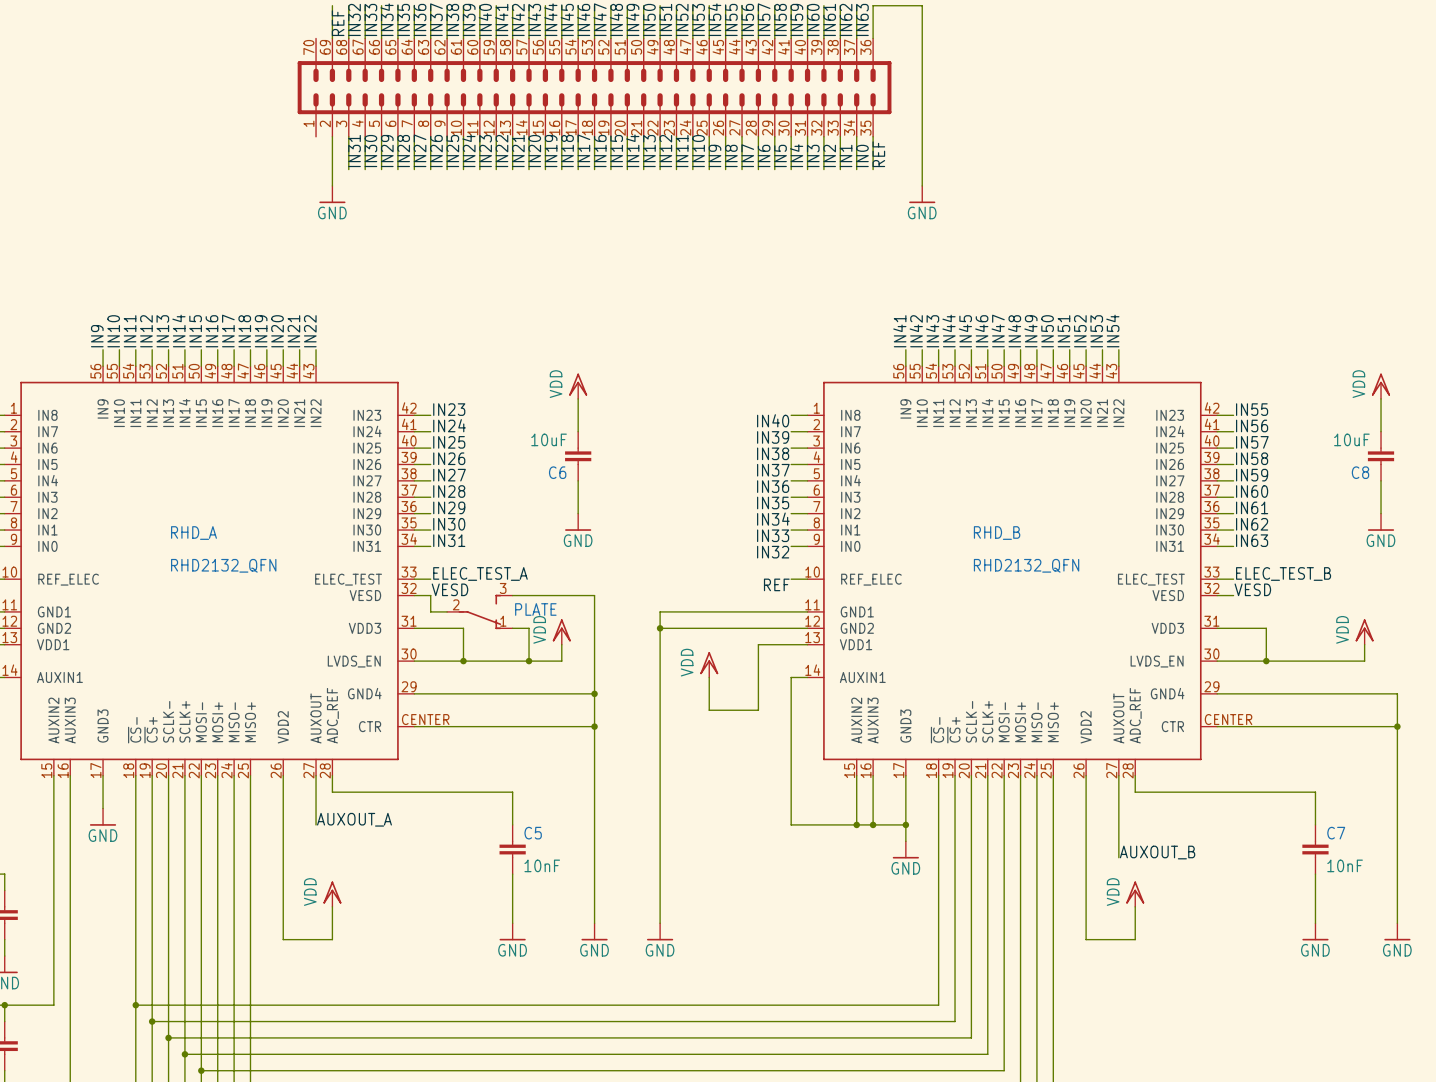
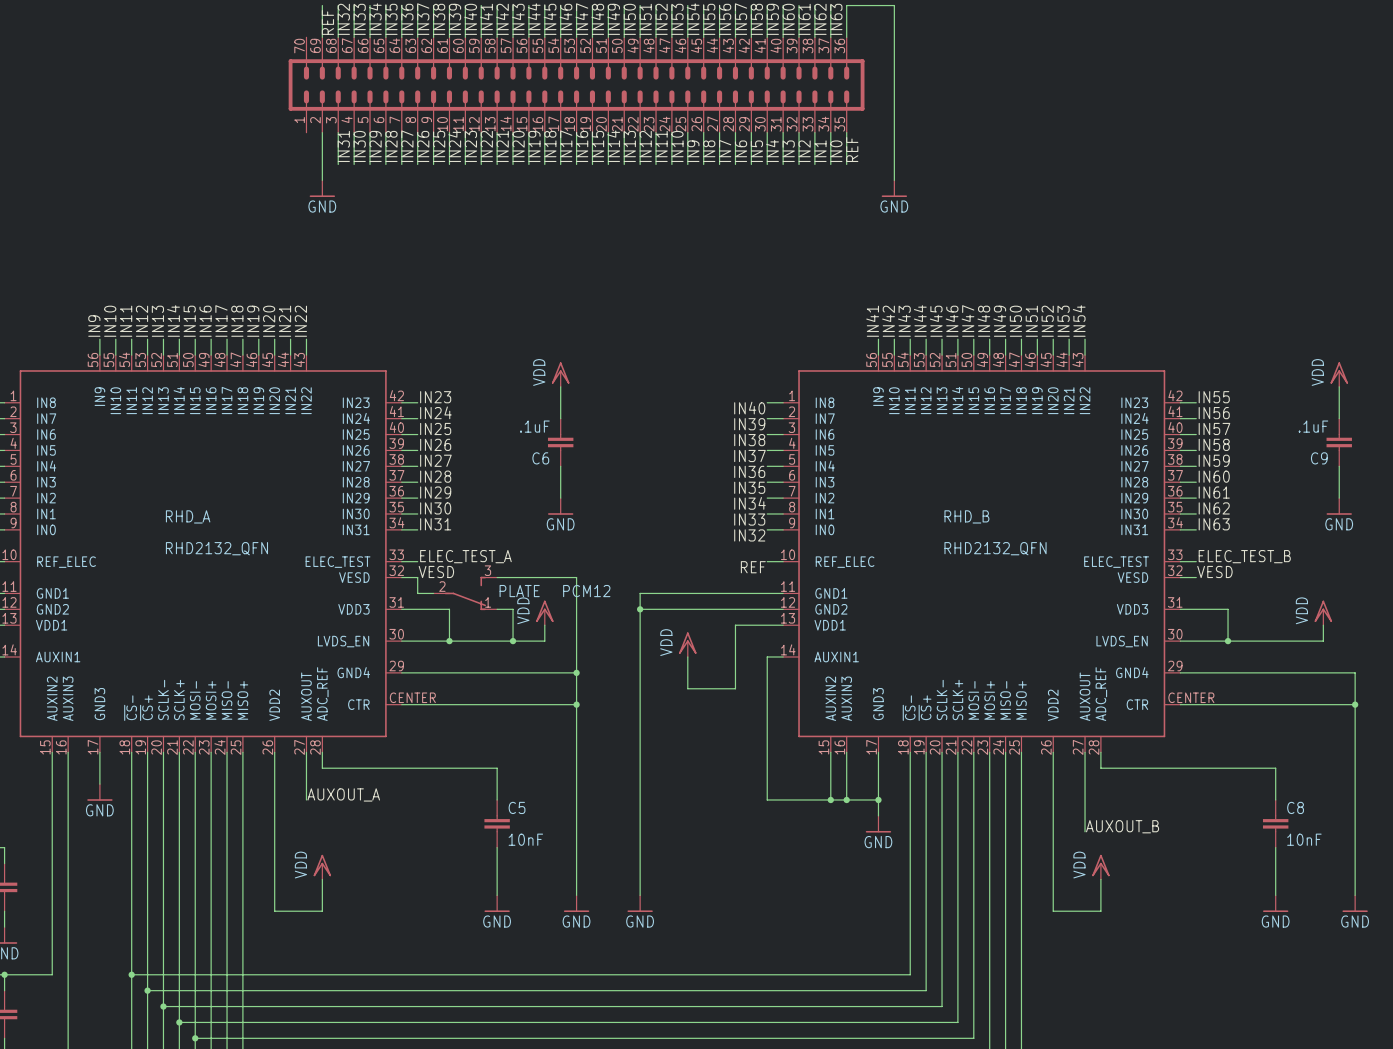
C6 value: 10uF (549, 439) -> .1uF (534, 426)
C8 value: 10uF (1351, 439) -> .1uF (1313, 426)
C8 name: C8 (1360, 472) -> C9 (1319, 458)
PLATE value: none -> PCM12 (586, 591)
C7 name: C7 (1336, 833) -> C8 (1295, 807)

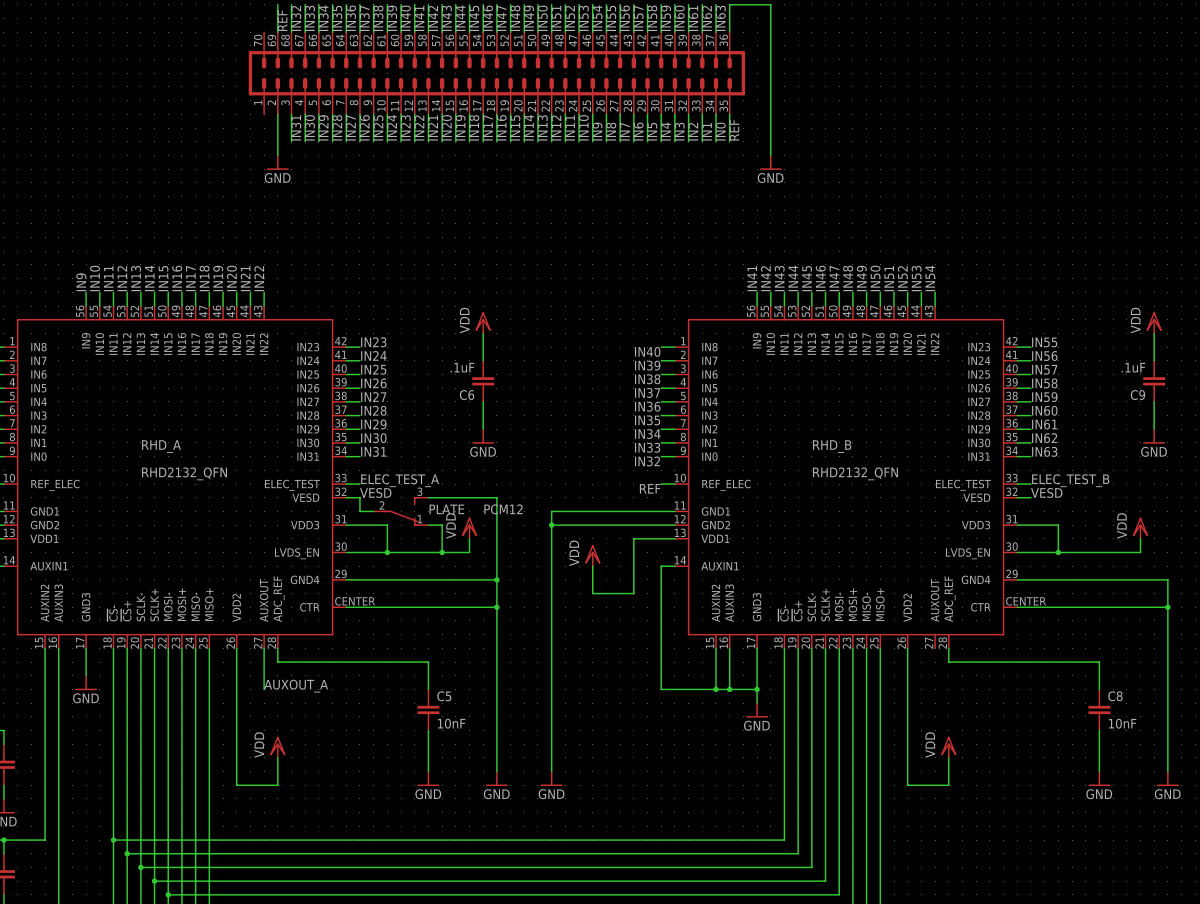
wire: (1085, 752) (1085, 831) -> none
label: AUXOUT_B (1122, 826) -> none

